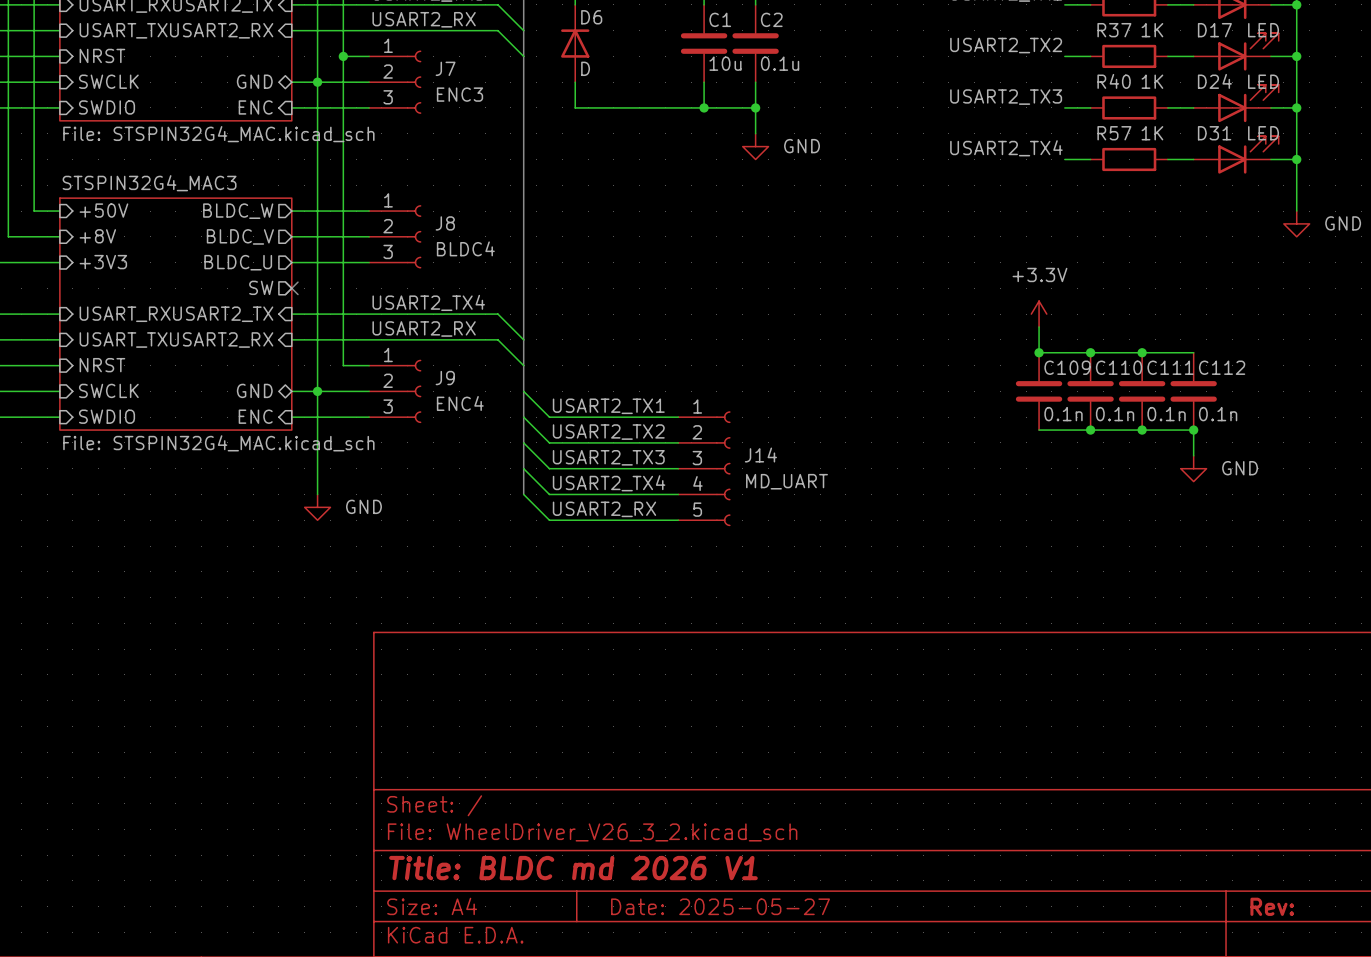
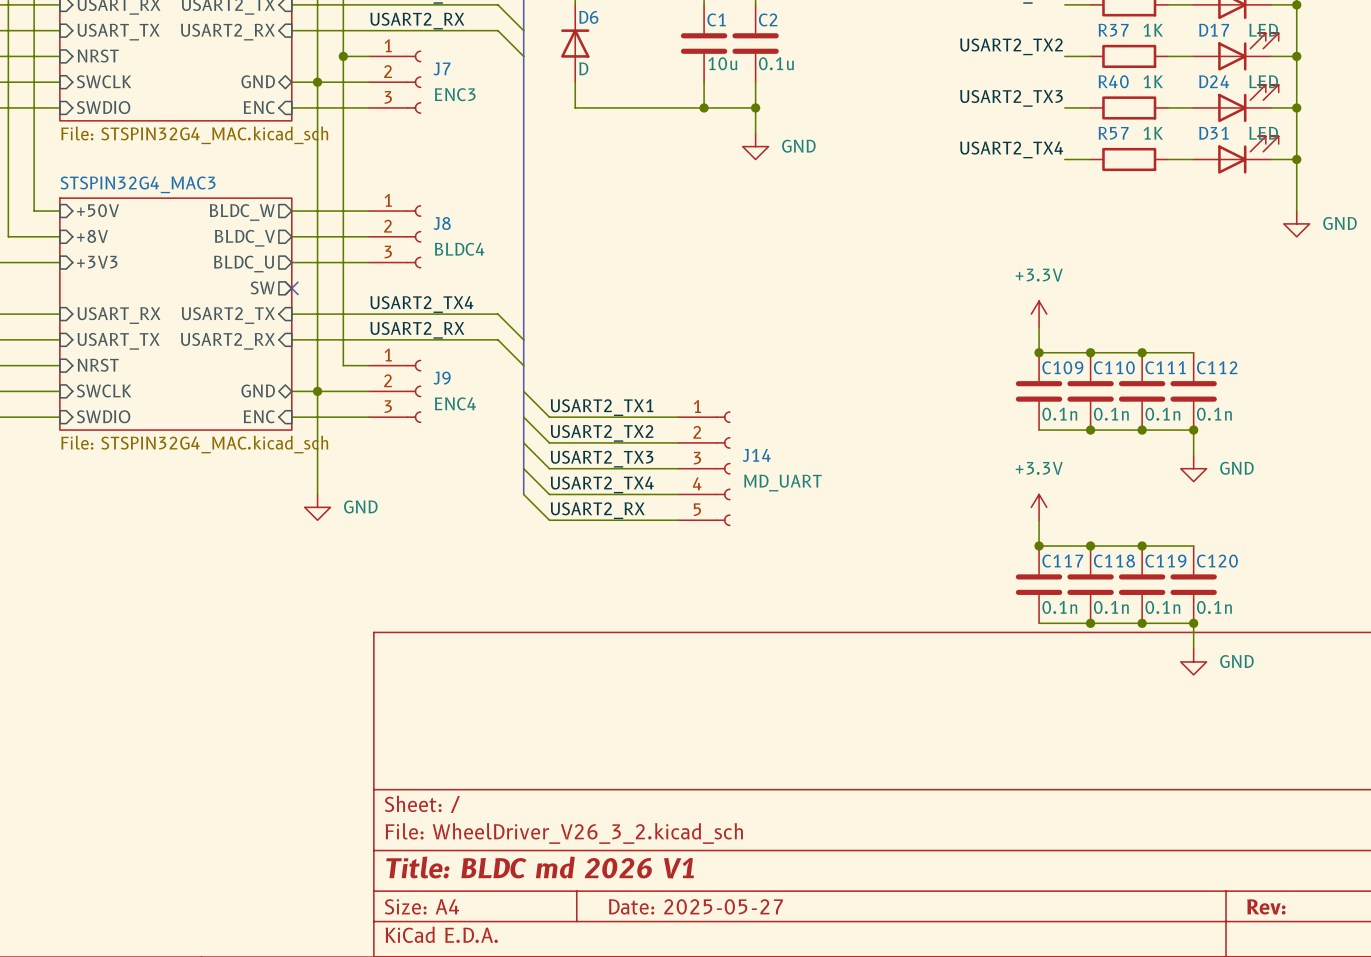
power symbol: none -> +3.3V (1039, 507)
wire: none -> (1039, 520) (1039, 546) (1193, 546)
junction: none -> (1039, 546)
junction: none -> (1090, 546)
junction: none -> (1142, 546)
C117: none -> 0.1n (1039, 584)
C118: none -> 0.1n (1090, 584)
C119: none -> 0.1n (1142, 584)
C120: none -> 0.1n (1193, 584)
wire: none -> (1039, 623) (1193, 623) (1193, 649)
junction: none -> (1090, 623)
junction: none -> (1142, 623)
junction: none -> (1193, 623)
power symbol: none -> GND (1193, 661)

